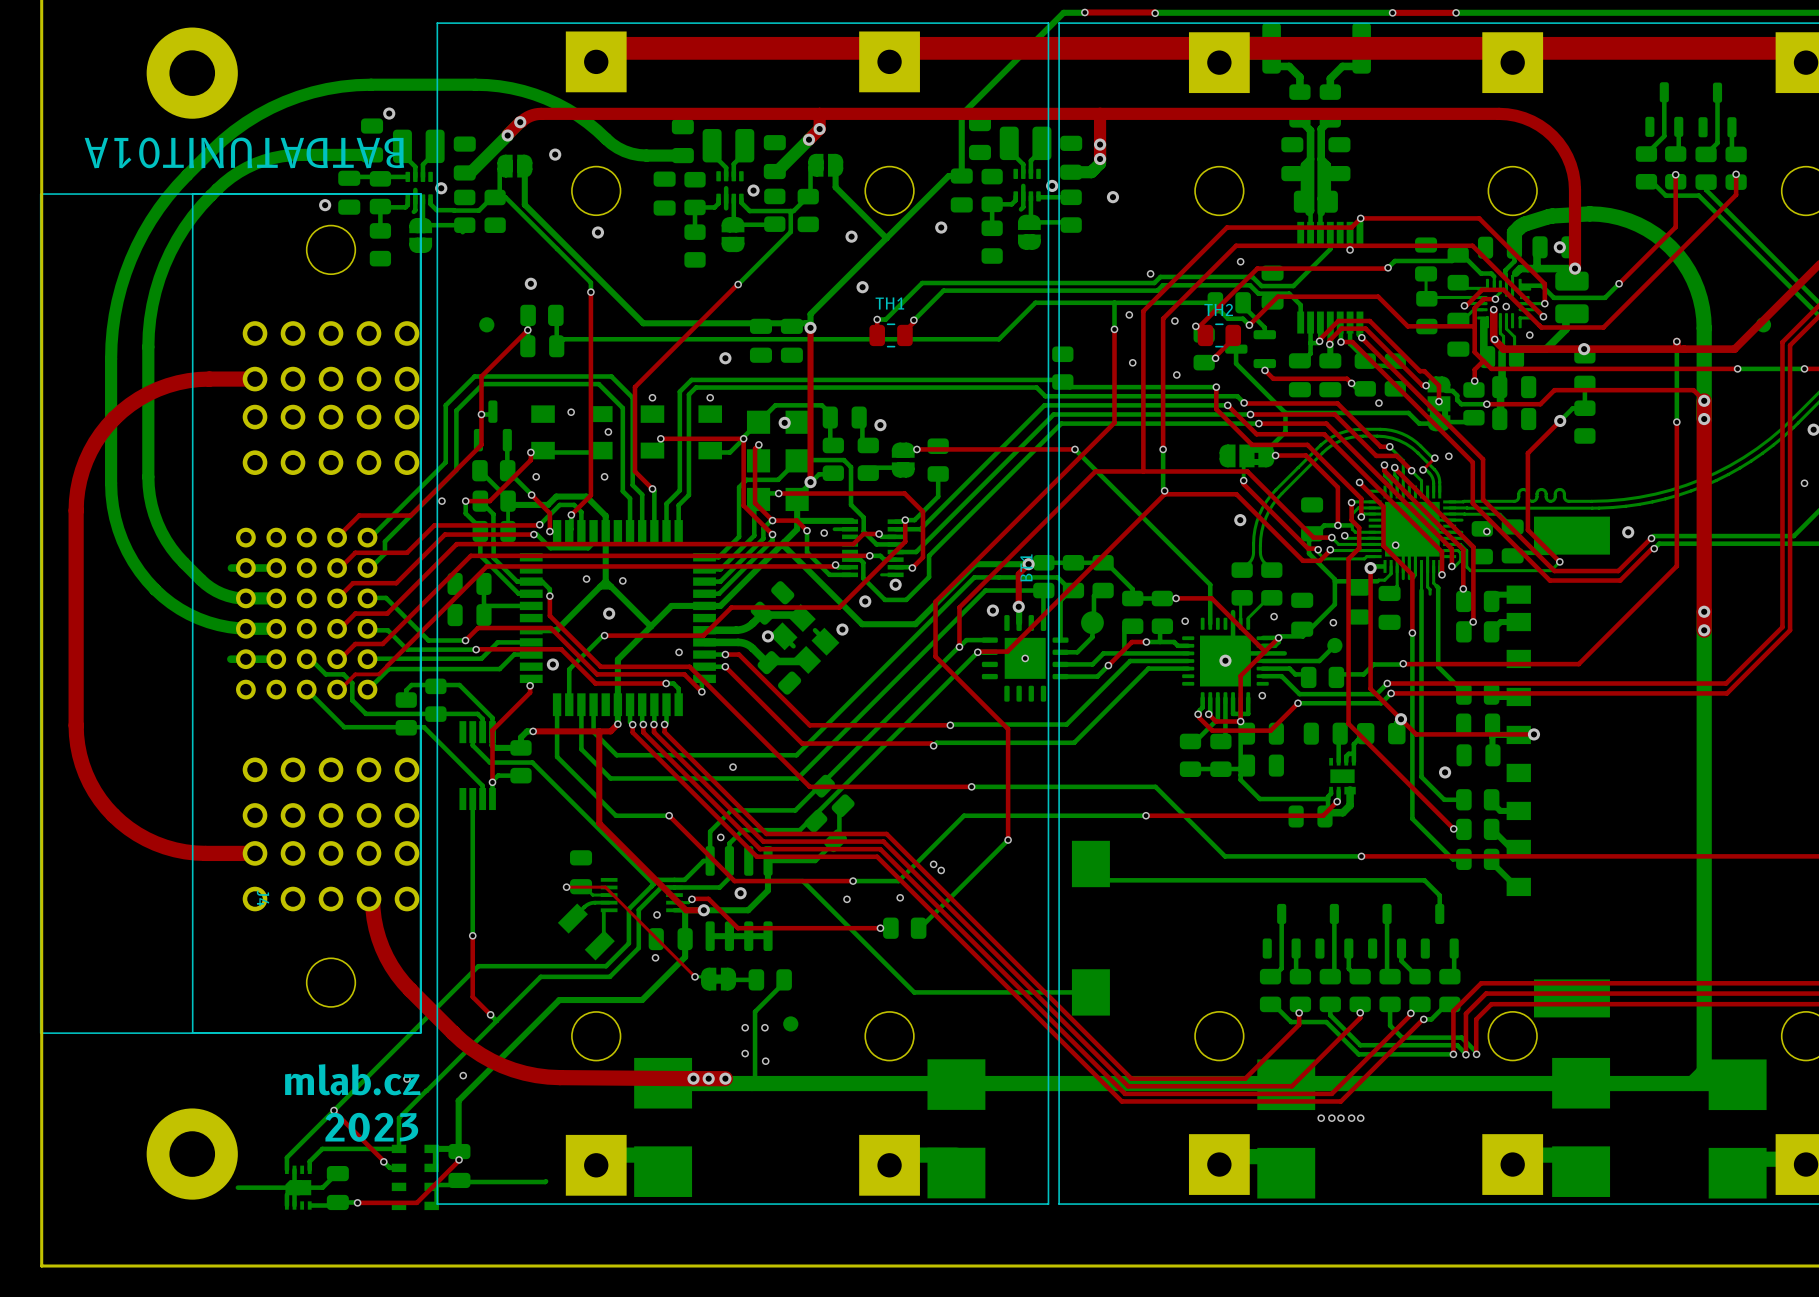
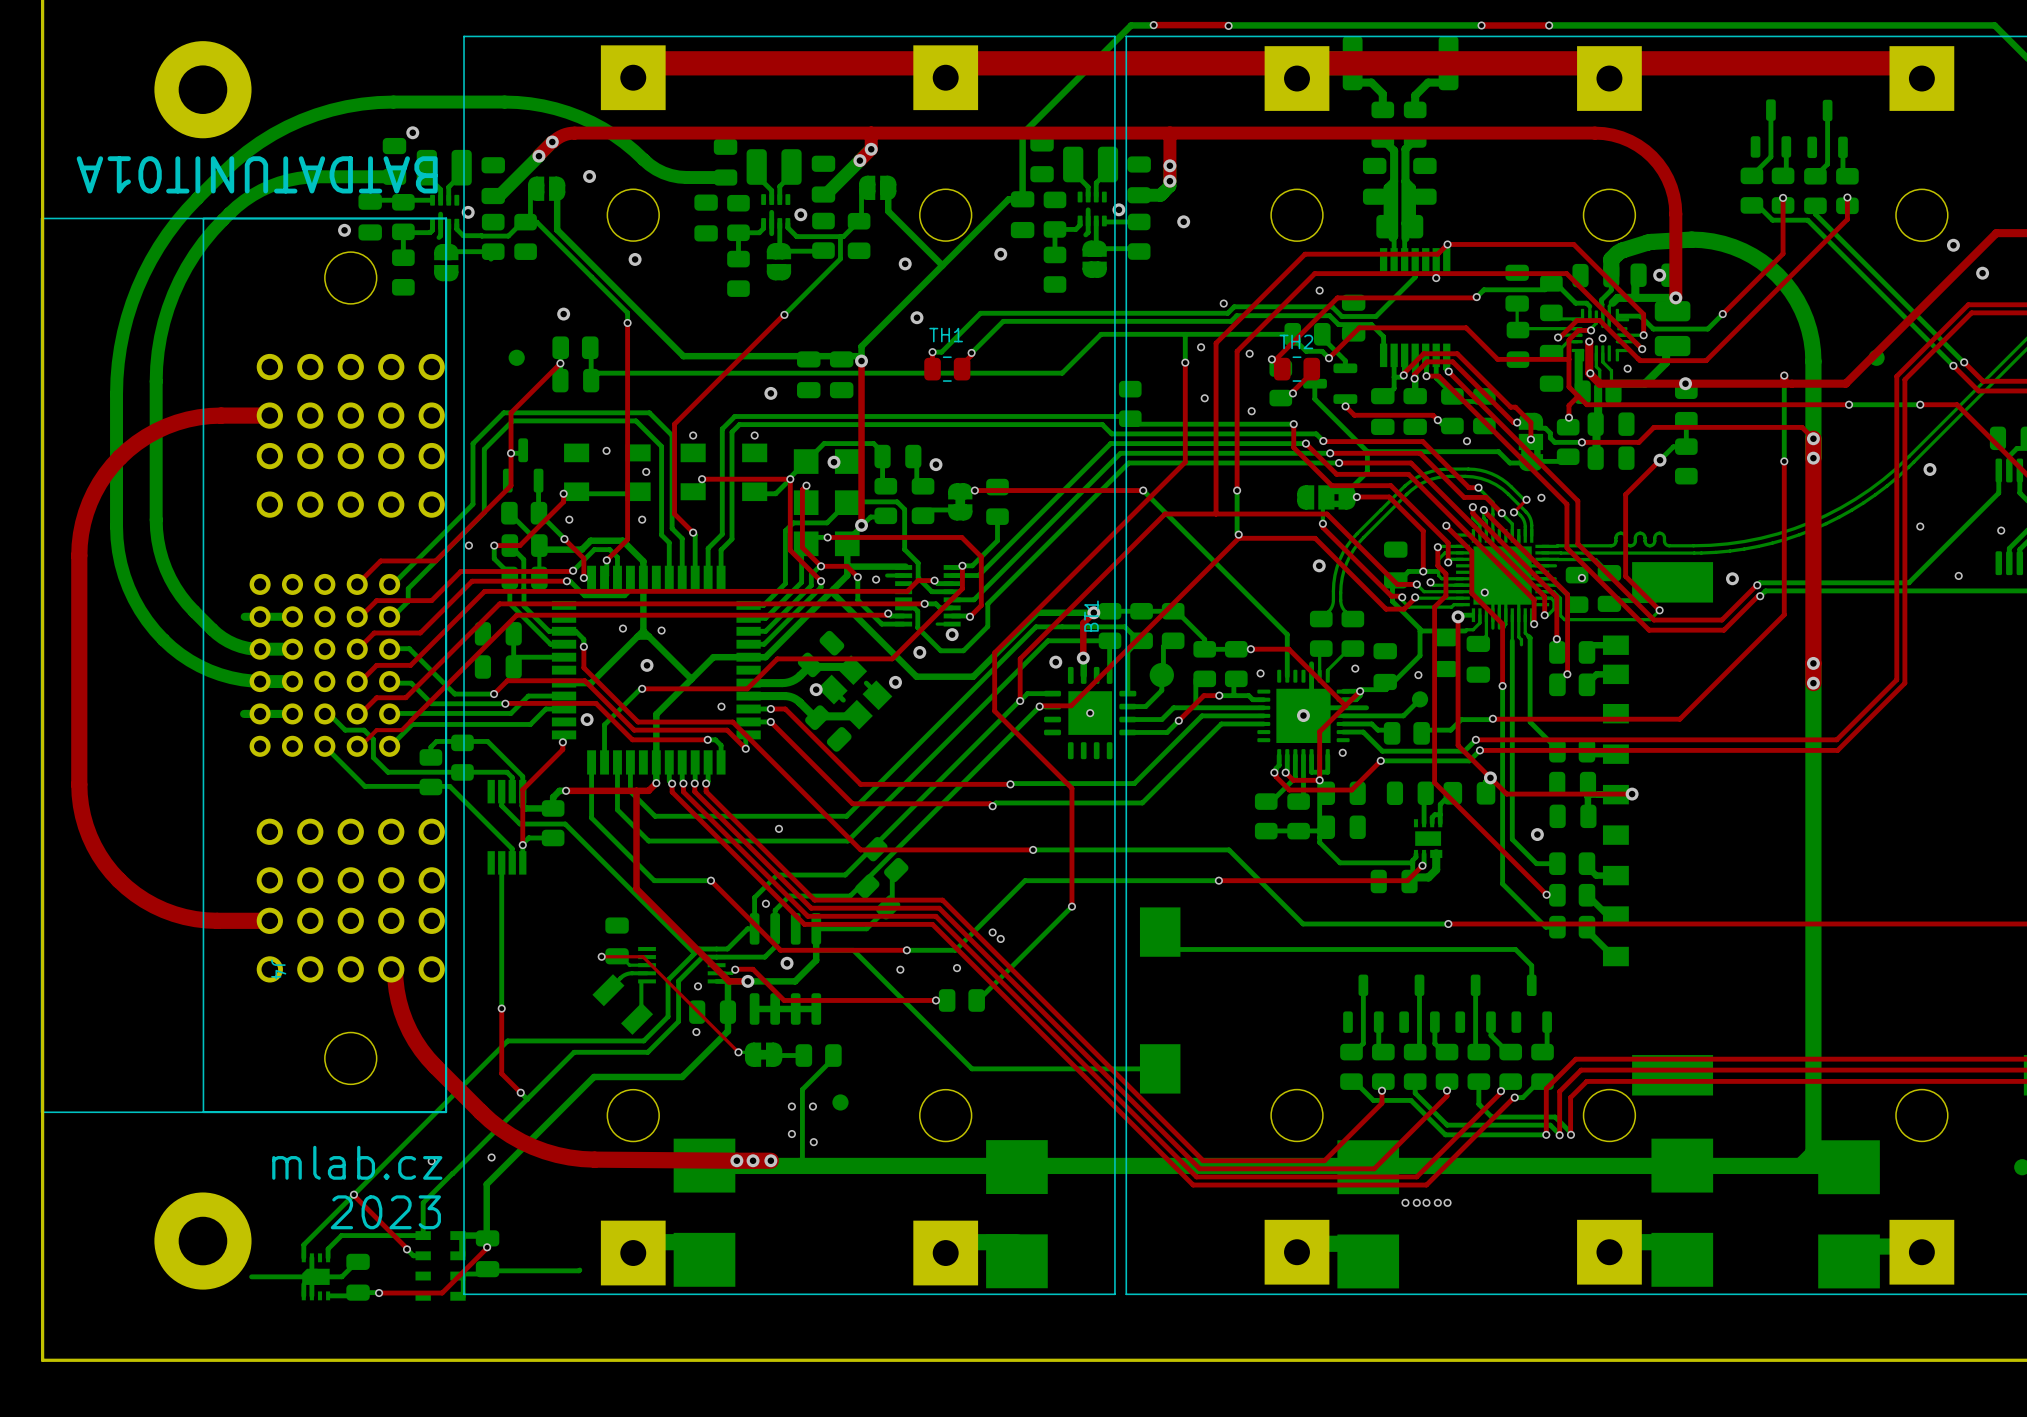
part footprint: [891, 442, 915, 478] -> [948, 483, 973, 521]

